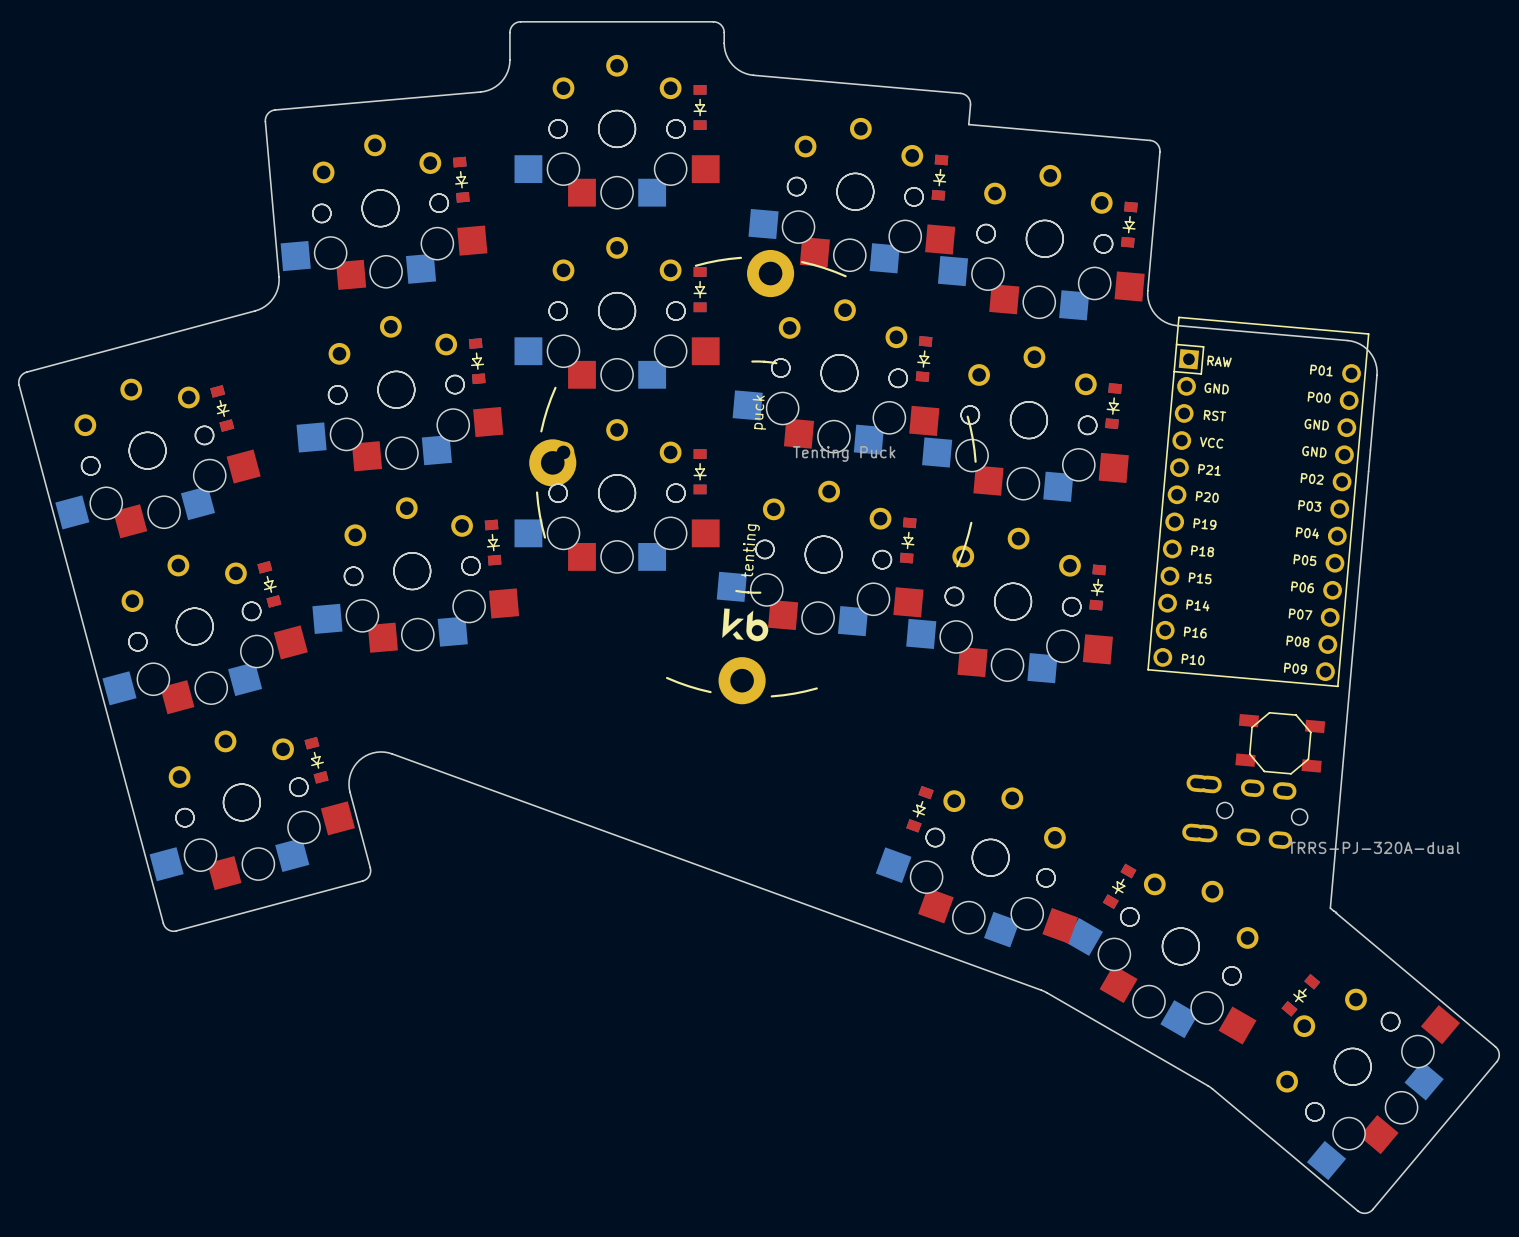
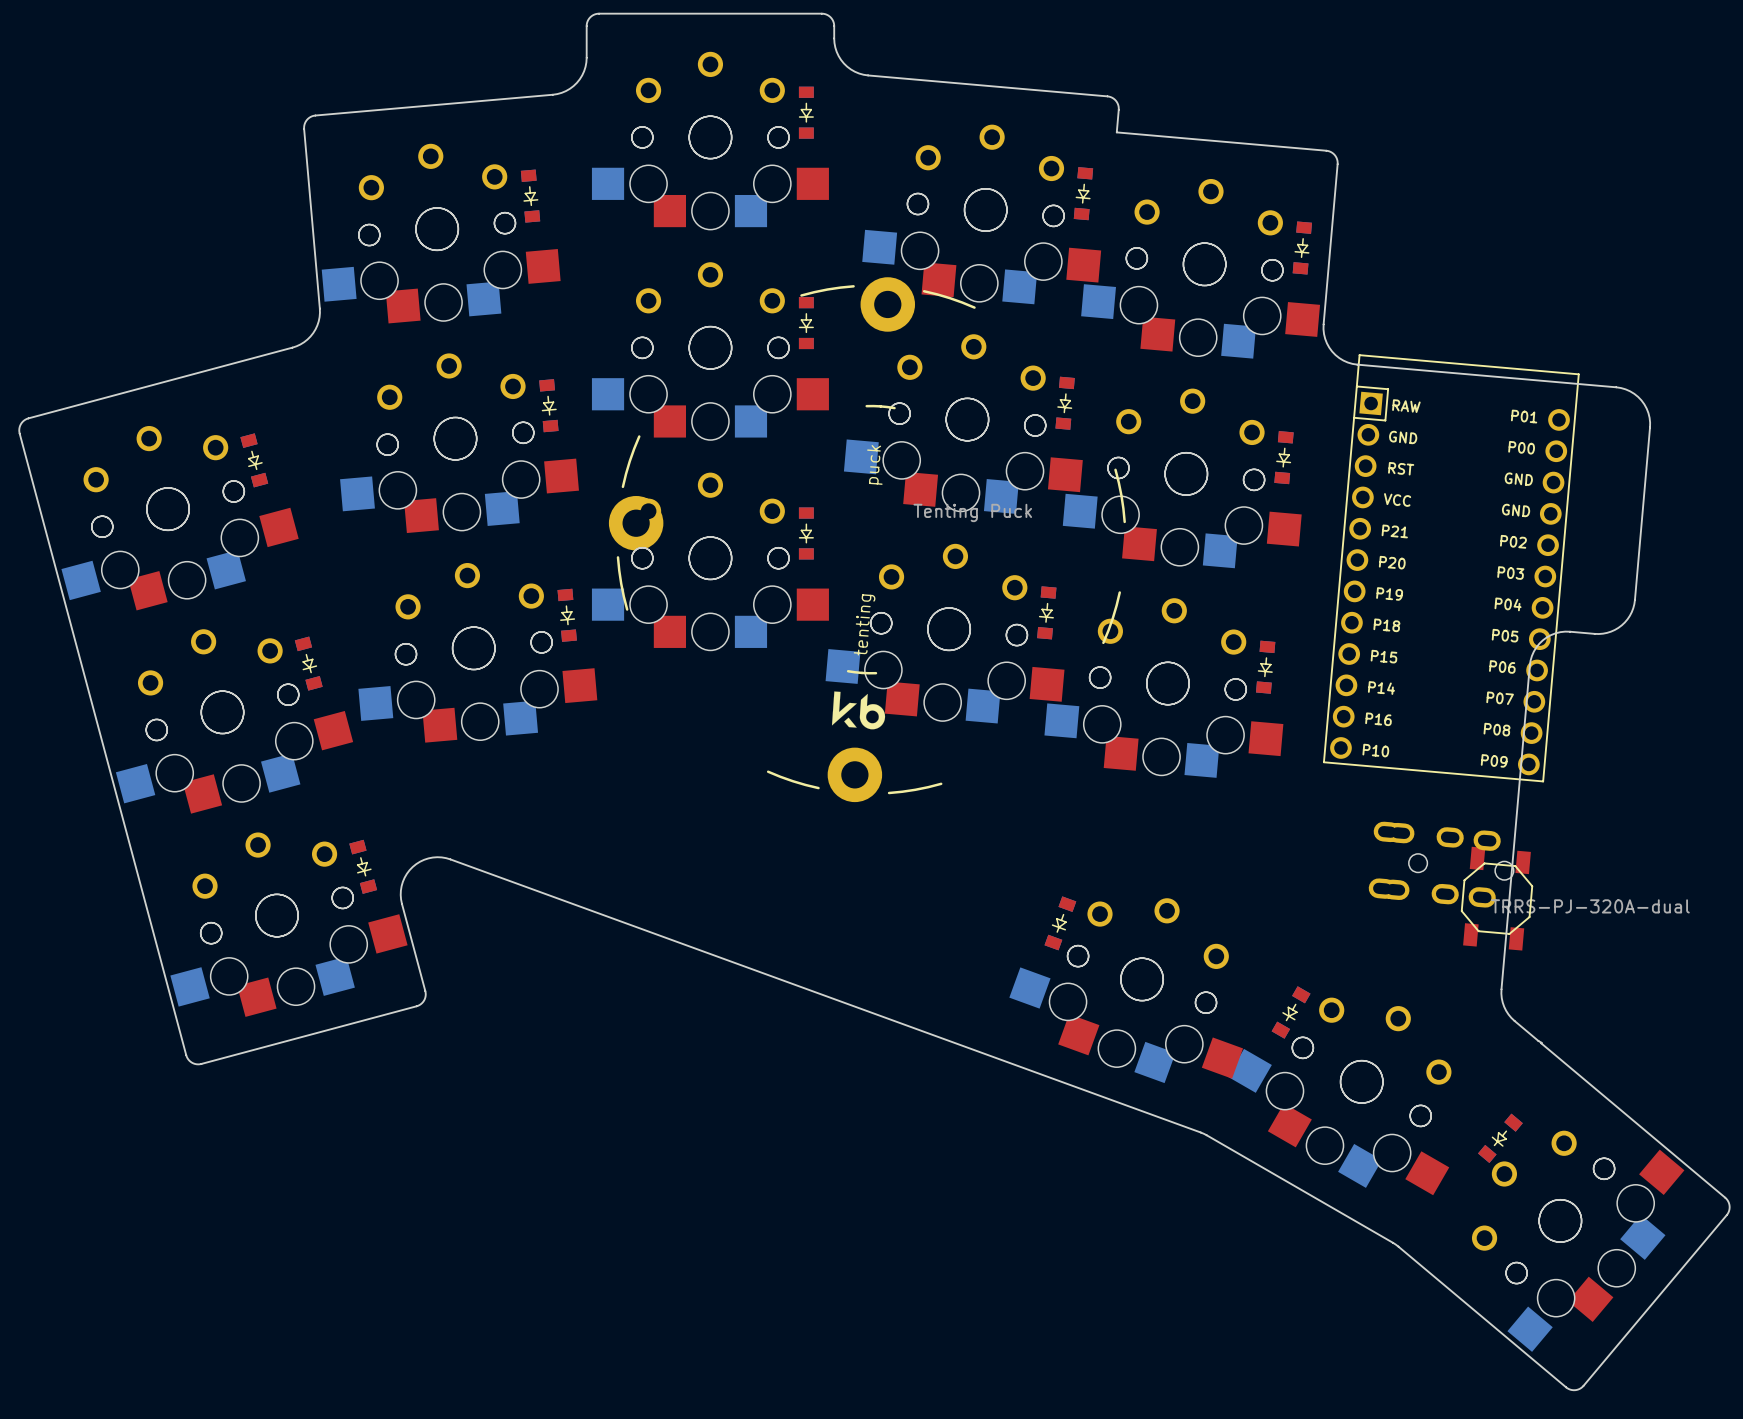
board edge: (1347, 340) (1359, 344) (1369, 351) (1375, 362) (1376, 375) (1330, 908) -> (1554, 381) (1616, 387) (1630, 391) (1641, 400) (1646, 408) (1650, 427) (1634, 600) (1631, 612) (1621, 625) (1607, 632) (1565, 631) (1551, 635) (1536, 647) (1530, 660) (1501, 993) (1504, 1006) (1508, 1014) (1534, 1037)
part rotation: 0° (1280, 743) -> 90° clockwise (1497, 898)
part position: (1244, 811) -> (1441, 864)

